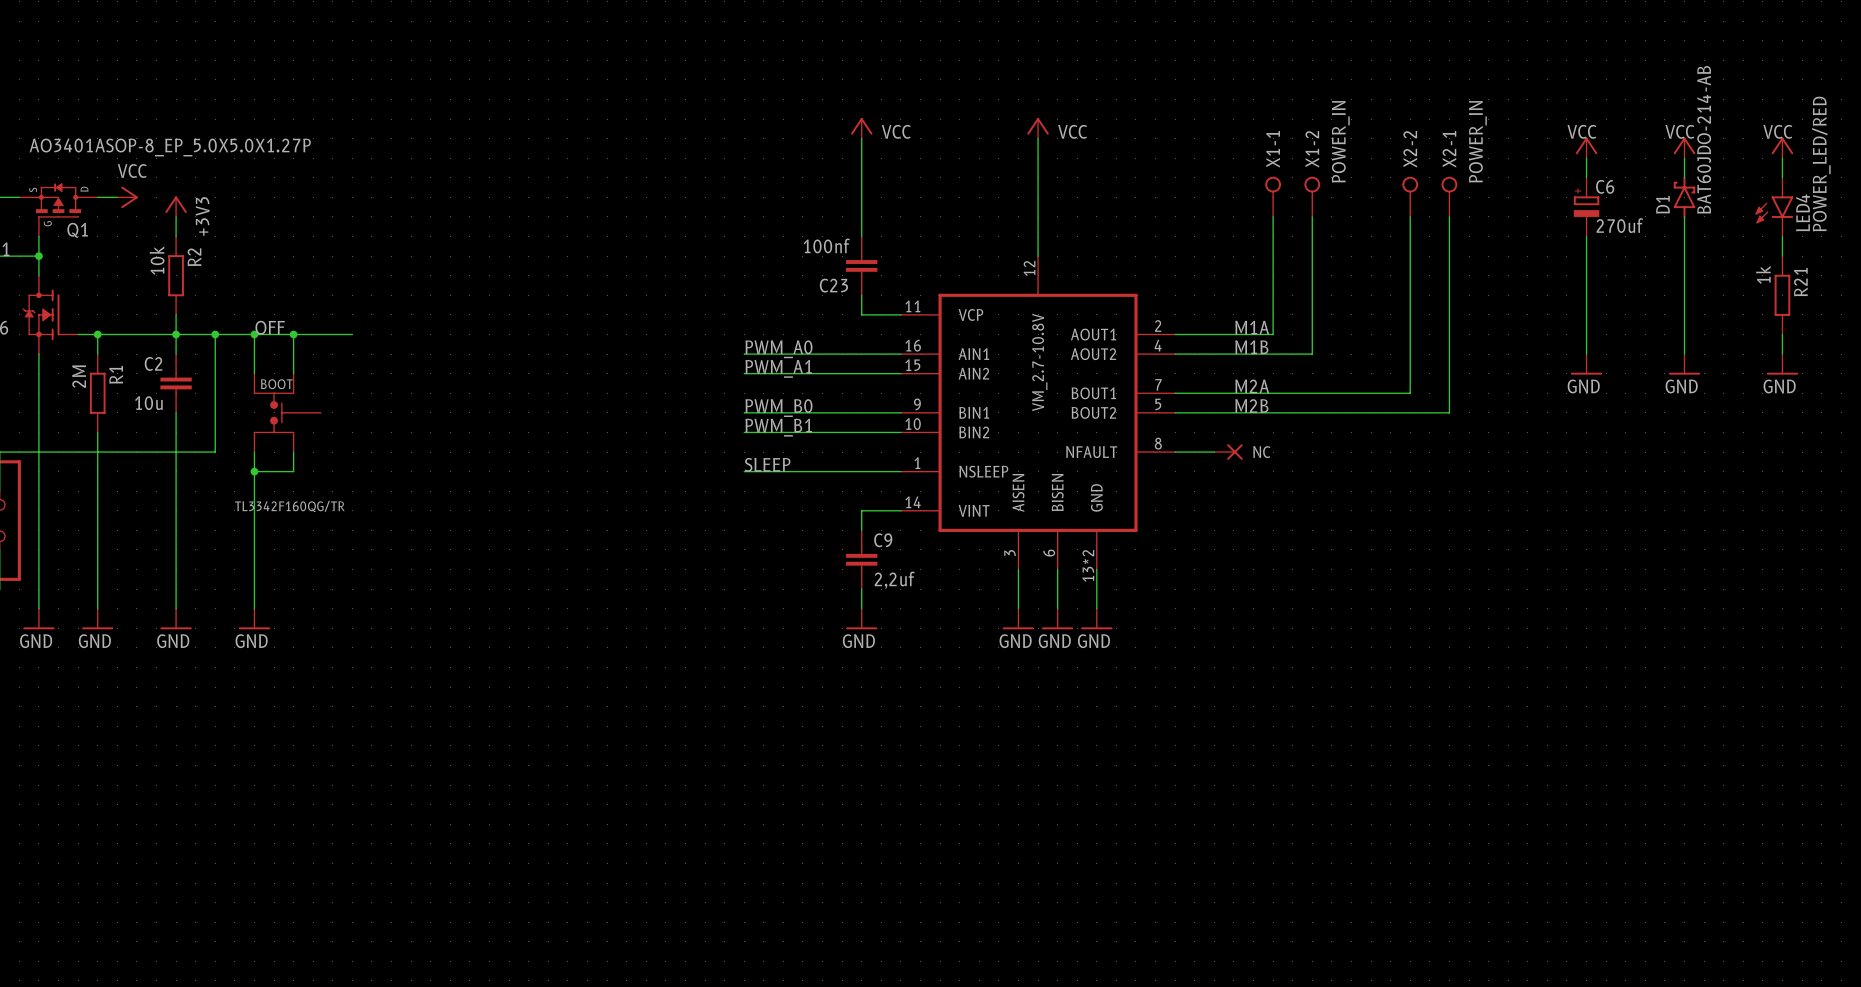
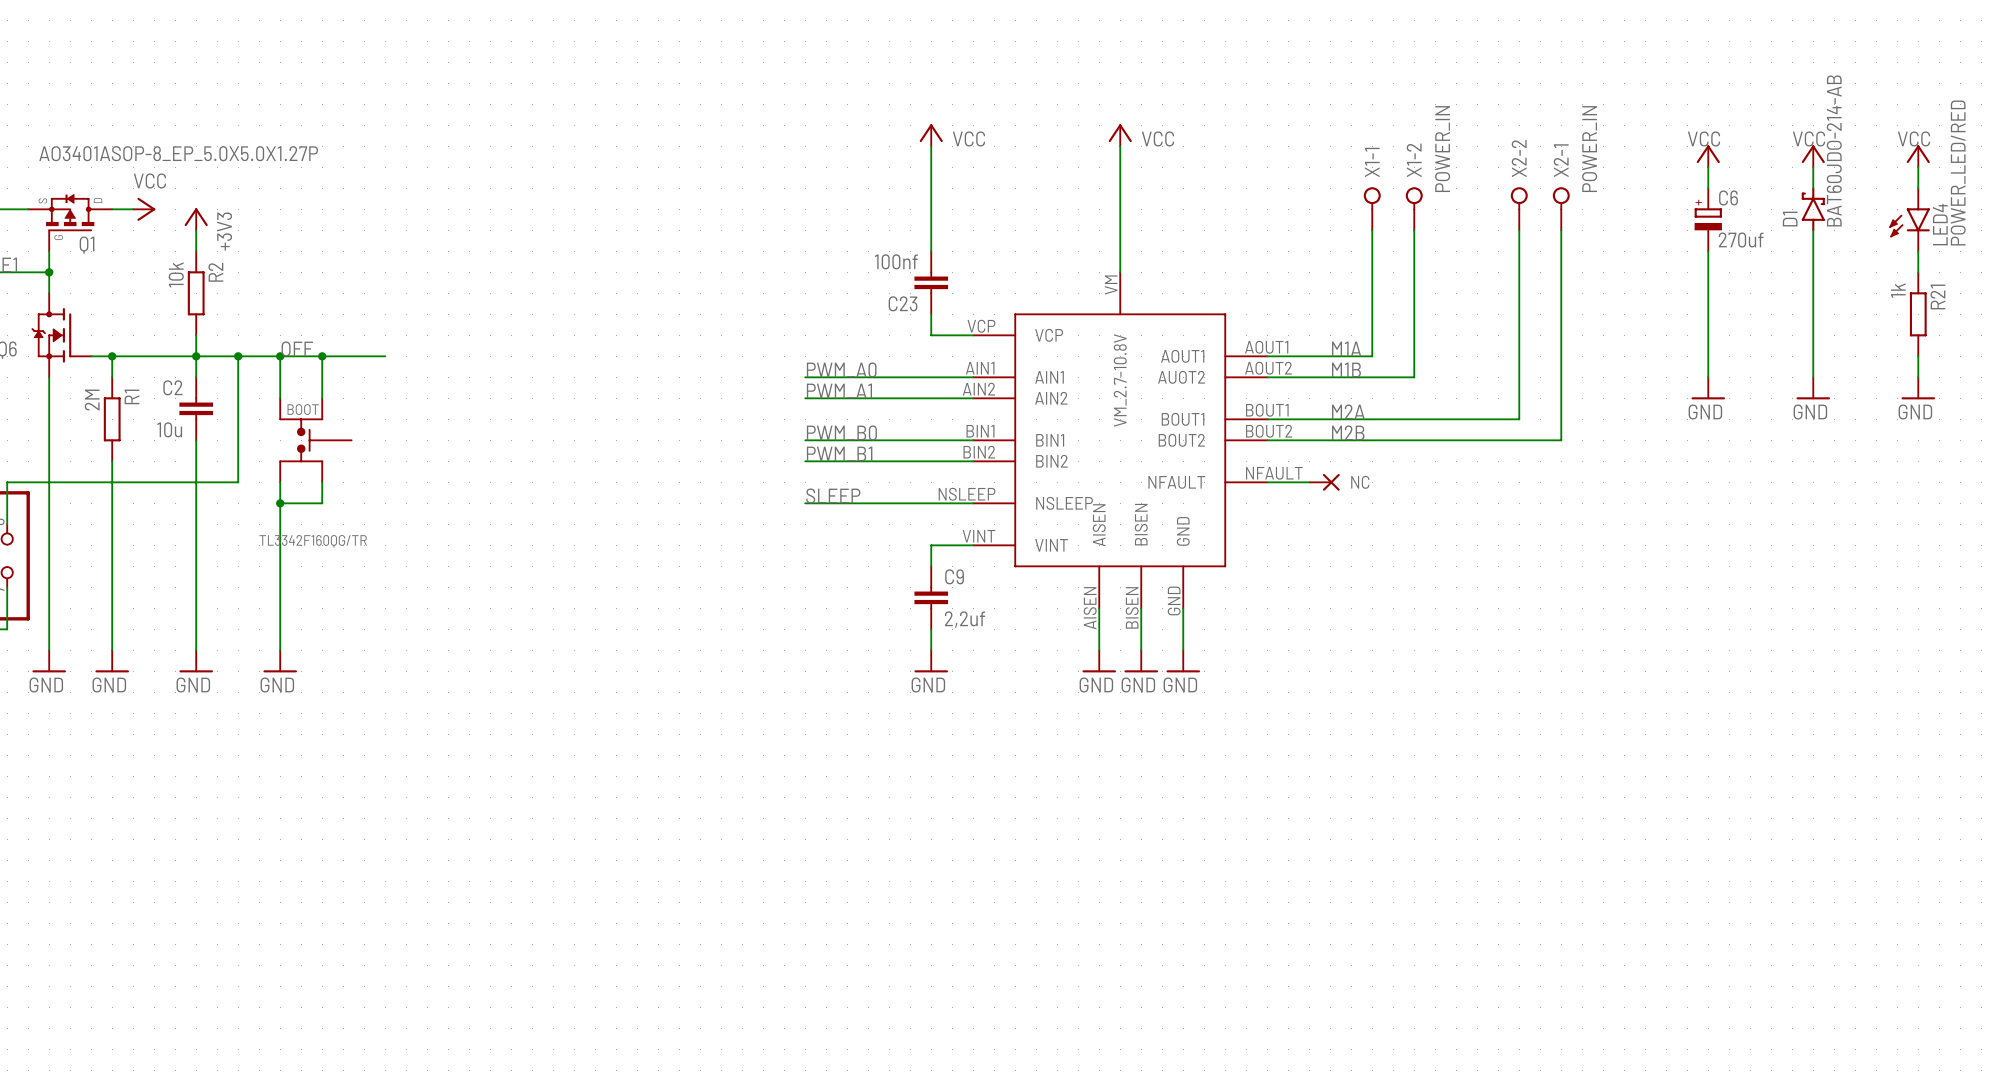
part symbol: [900, 256, 1176, 570] -> [973, 272, 1268, 609]

